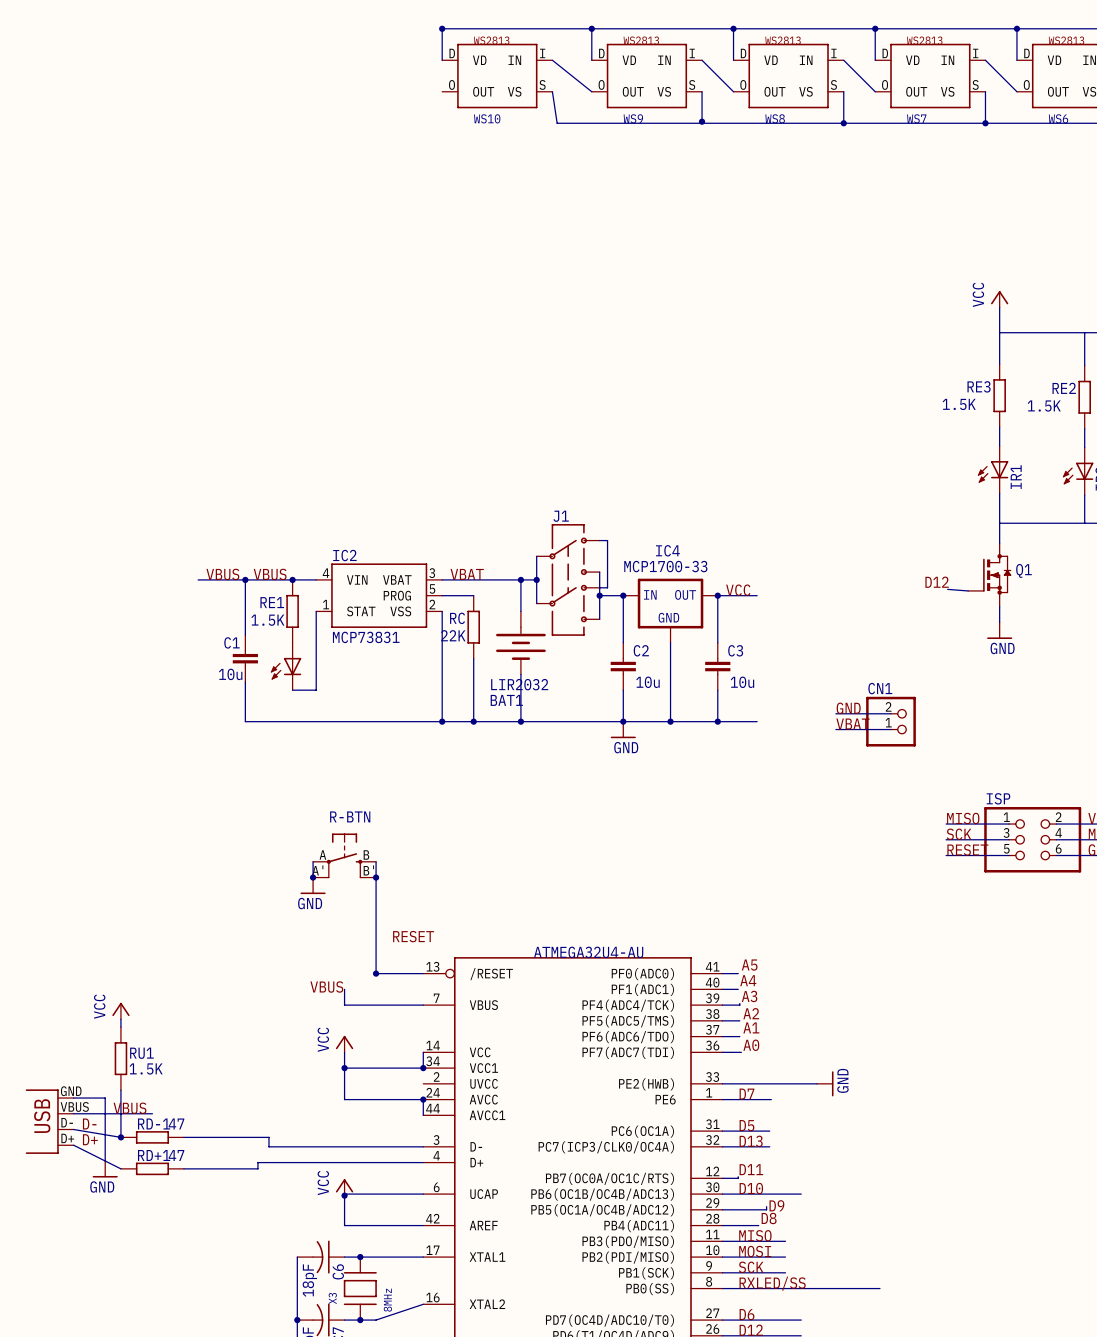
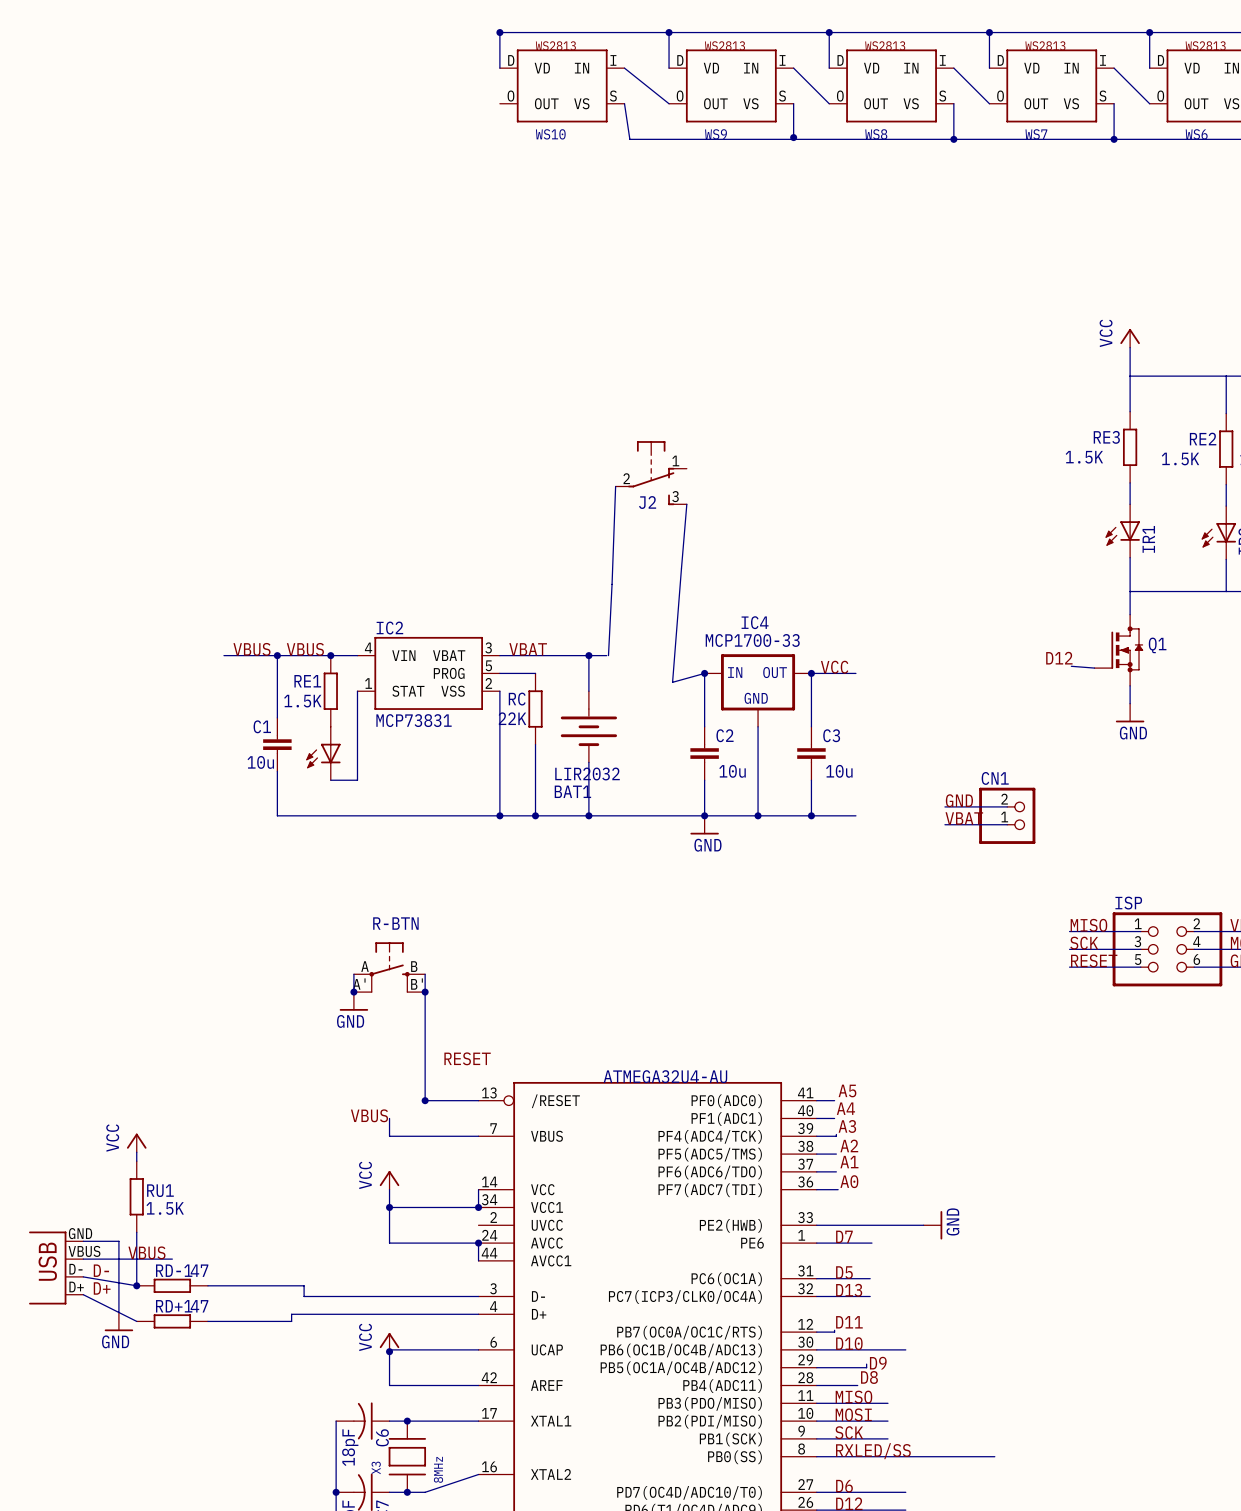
J2: none -> (651, 473)
wire: none -> (615, 486) (608, 655)
wire: (599, 540) (607, 540) (607, 587) (599, 587) -> none
wire: (536, 556) (536, 603) -> none
wire: (599, 572) (599, 619) -> none
junction: (536, 579) -> none
J1: (568, 579) -> none
wire: (599, 595) (623, 595) -> (686, 504) (672, 682) (704, 673)
junction: (599, 595) -> none

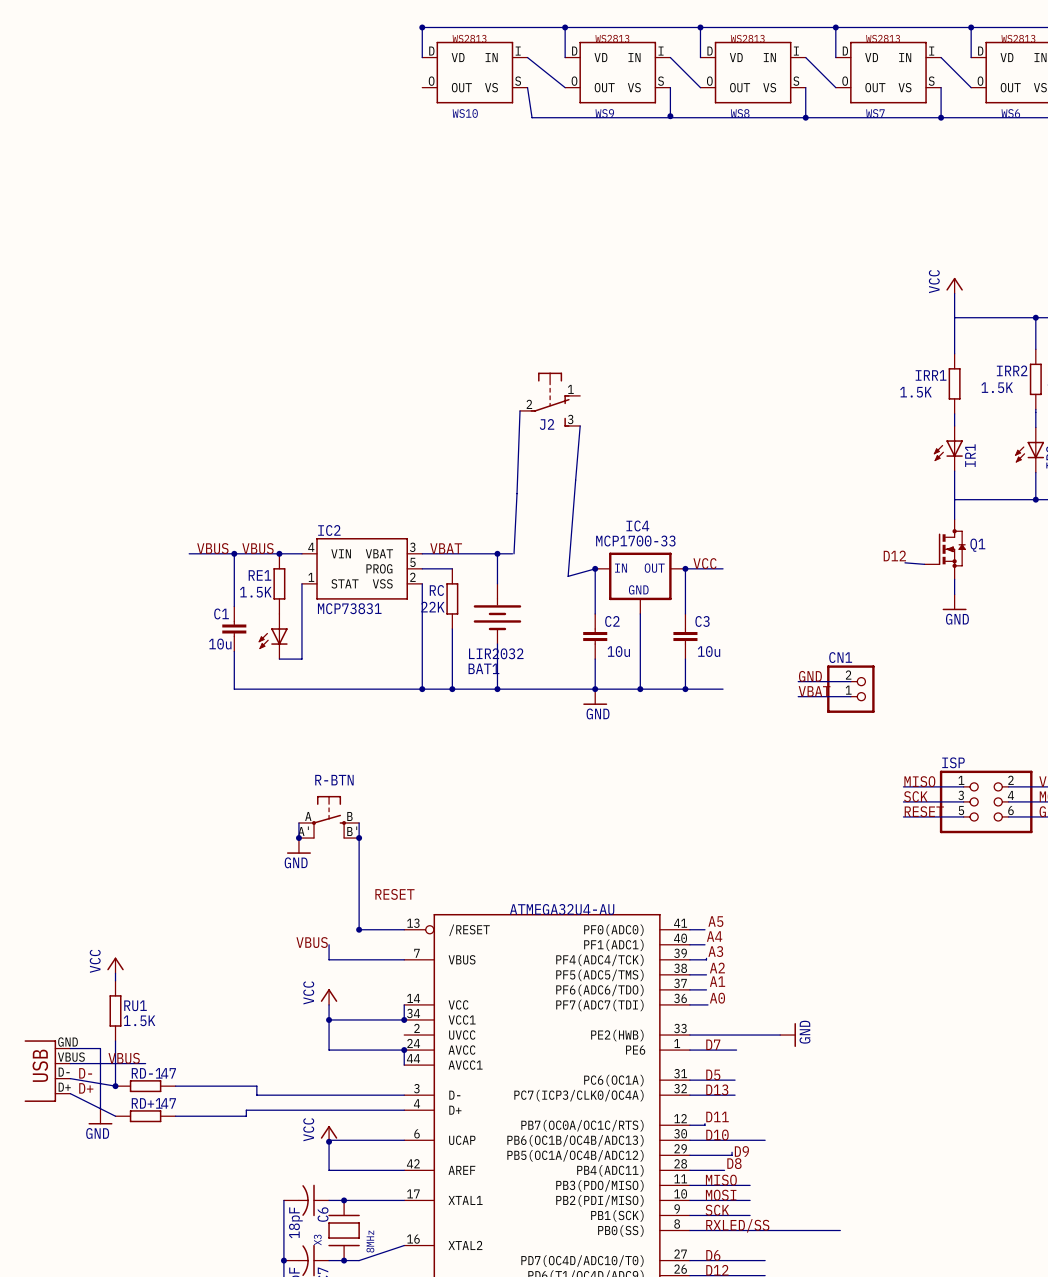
junction: none -> (1035, 317)
RE2 name: RE2 (1203, 439) -> IRR2 (1012, 370)
RE3: 1.5K (1130, 447) -> none
IRR1: none -> 1.5K (954, 383)
junction: none -> (1035, 499)

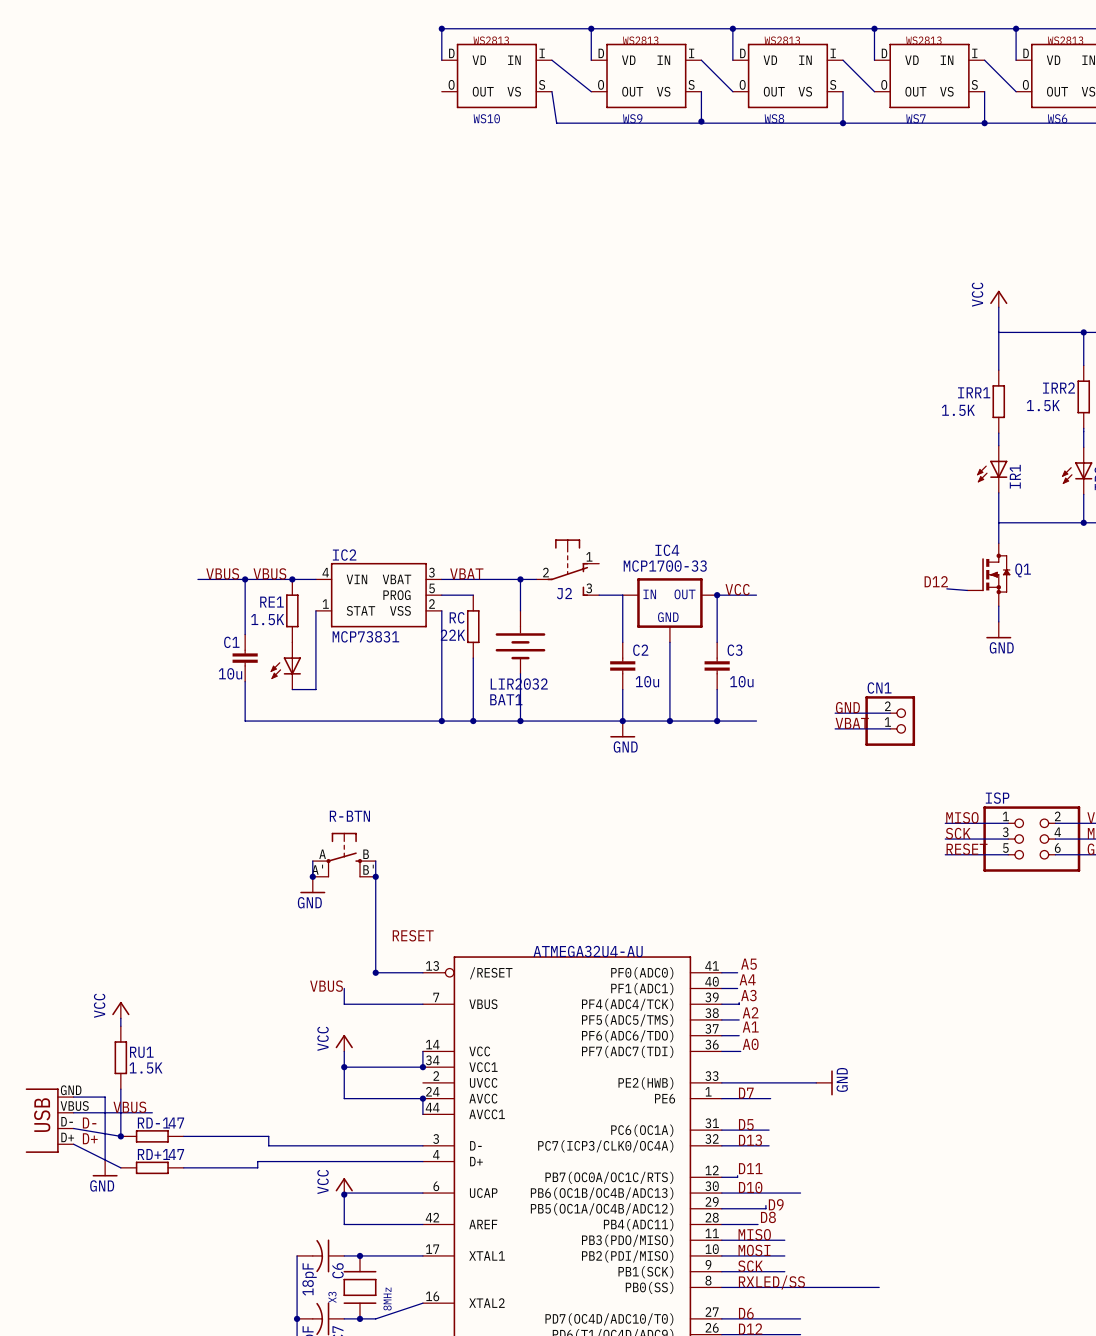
J2 position: (550, 399) -> (567, 567)
wire: (520, 410) (514, 553) -> none
wire: (580, 425) (568, 576) (595, 568) -> (599, 595) (622, 595)
junction: (595, 568) -> none

